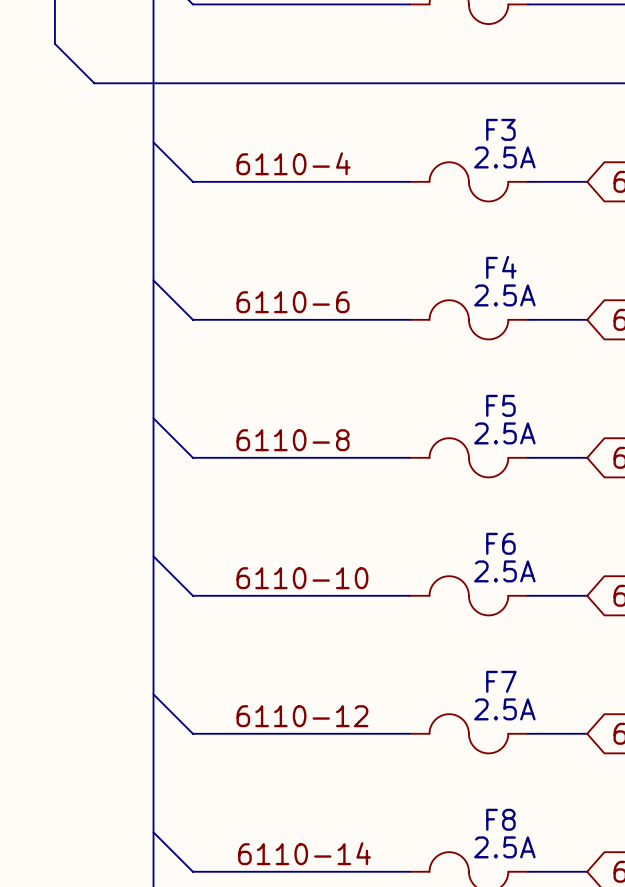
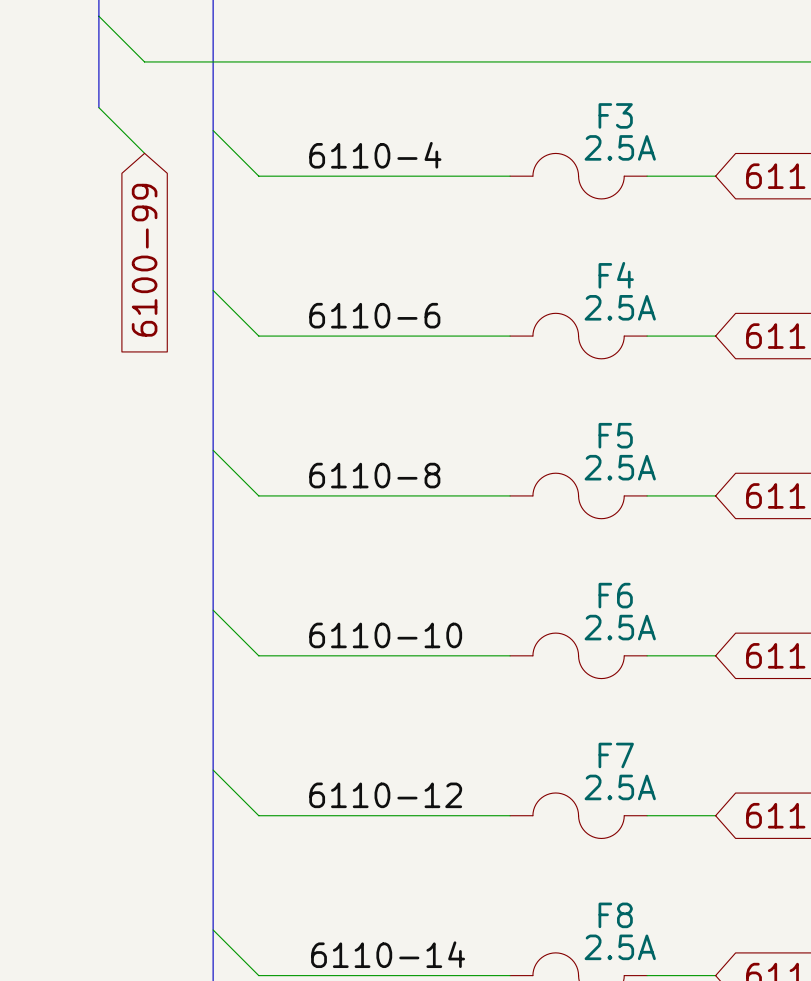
bus: none -> (98, 16) (98, 107)
wire: none -> (98, 107) (144, 153)
global label: none -> 6100-99 (144, 260)

